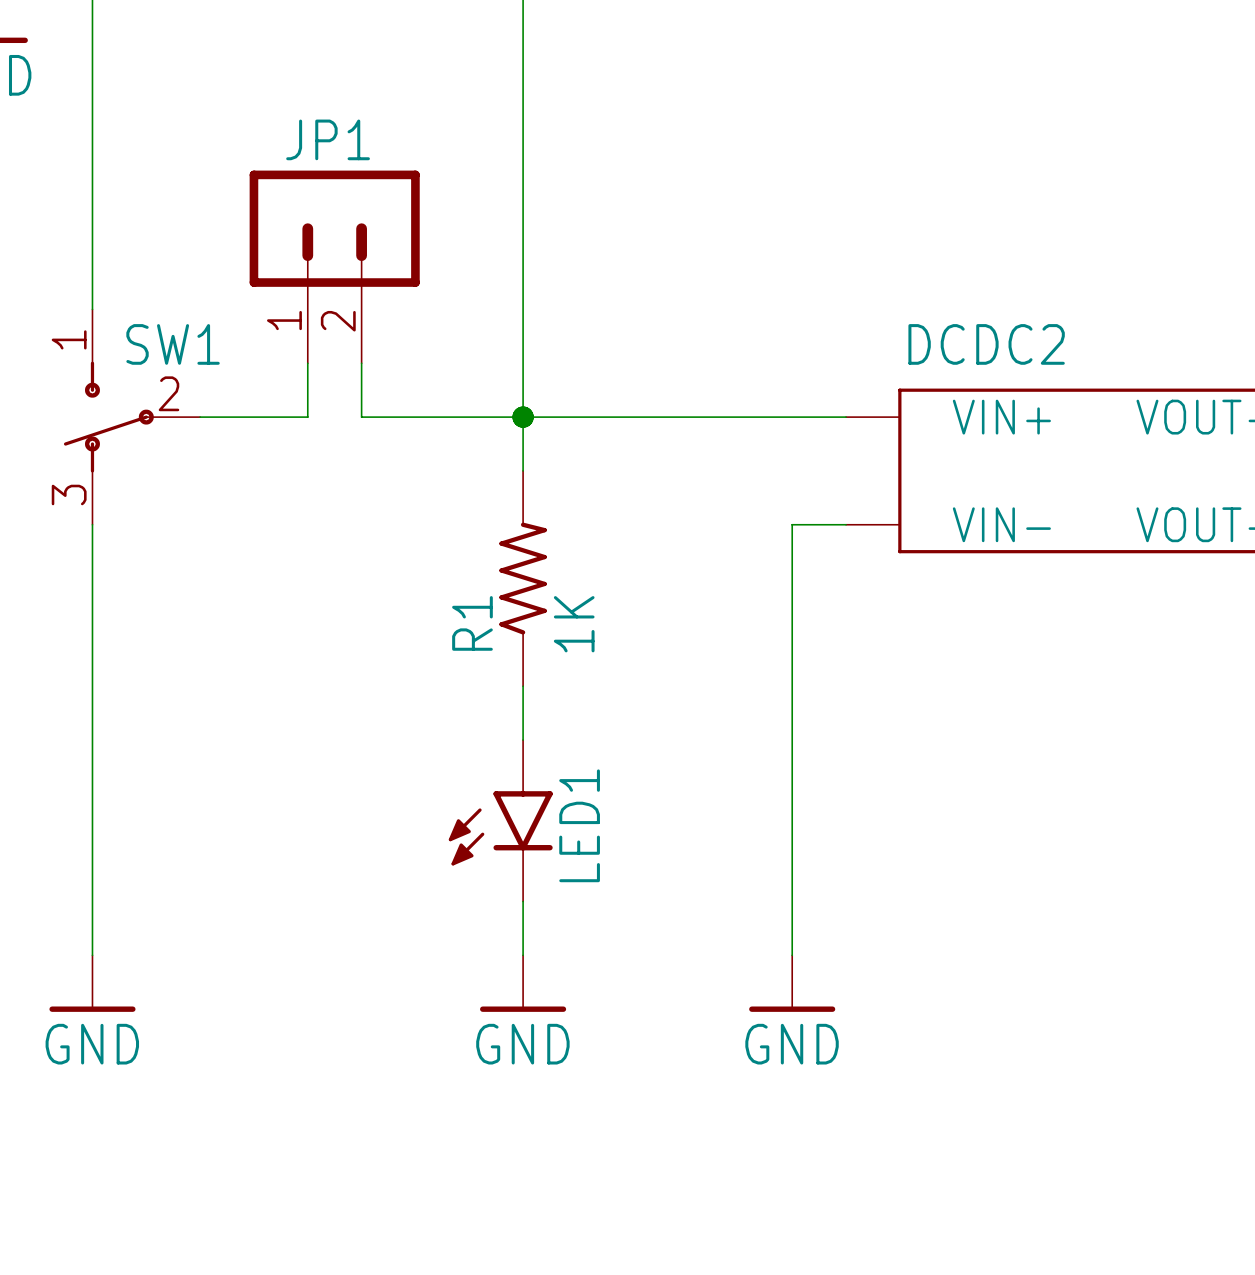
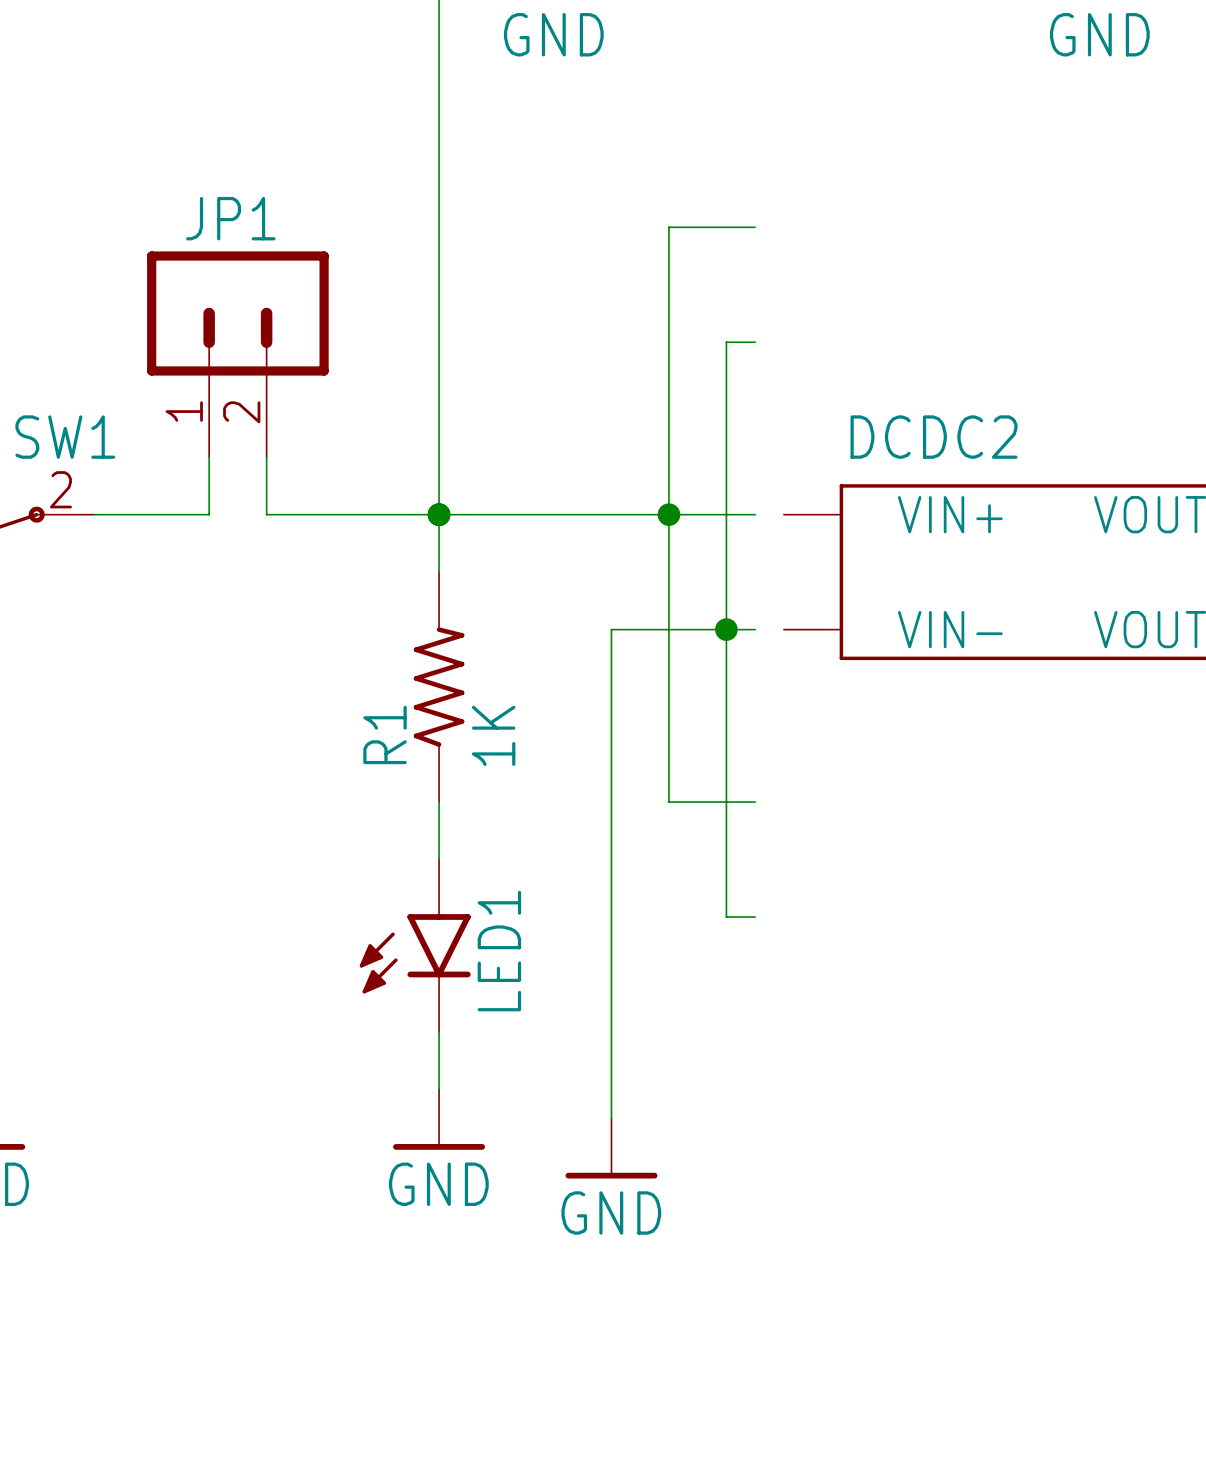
wire: none -> (755, 227) (668, 227) (668, 802) (755, 802)
wire: none -> (755, 342) (726, 342) (726, 629) (611, 629) (611, 1118)
junction: none -> (668, 514)
wire: (819, 417) (846, 417) -> none
junction: none -> (726, 629)
wire: (819, 524) (846, 524) -> none
wire: (792, 793) (792, 955) -> (726, 917) (755, 917)
power symbol position: GND (792, 983) -> GND (611, 1148)

